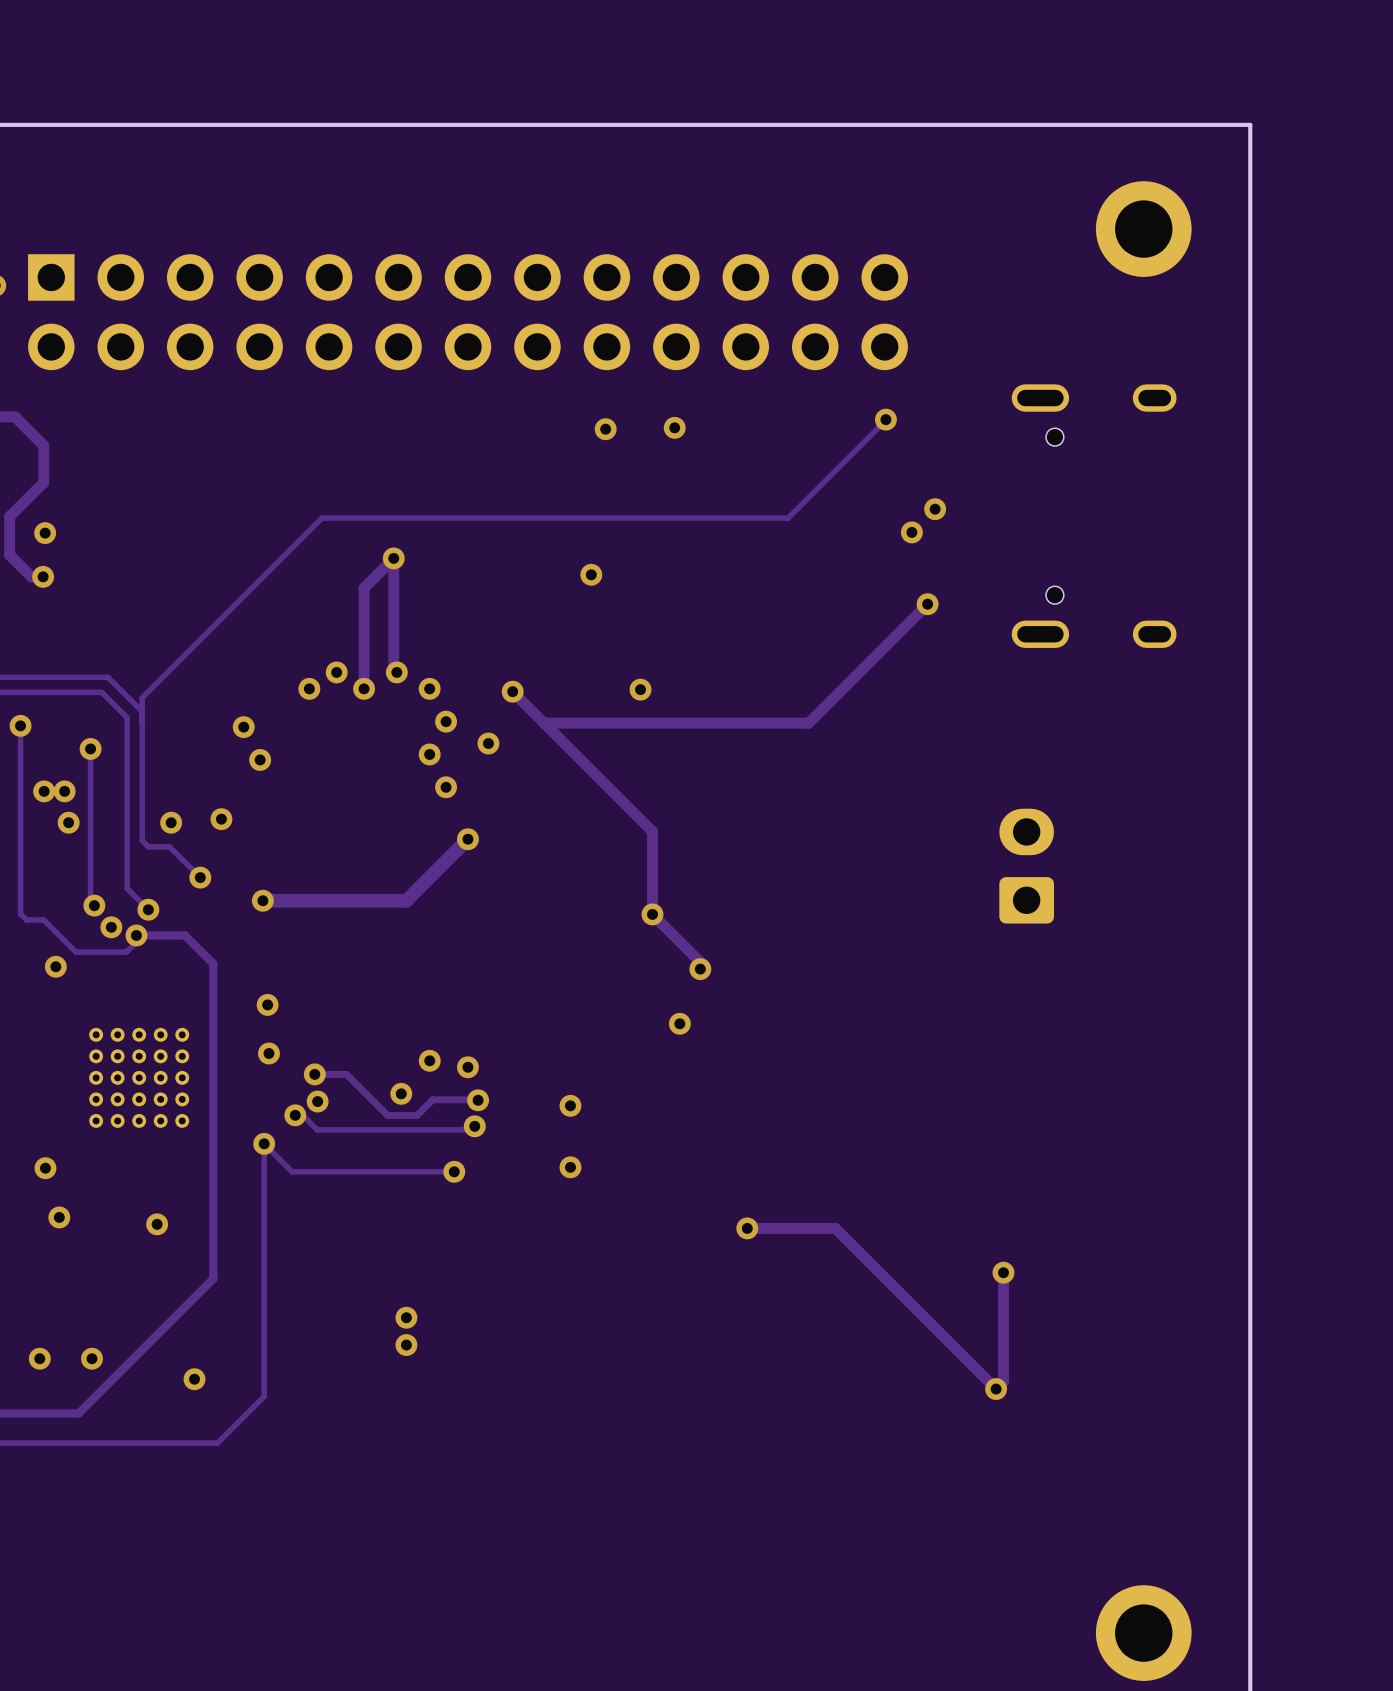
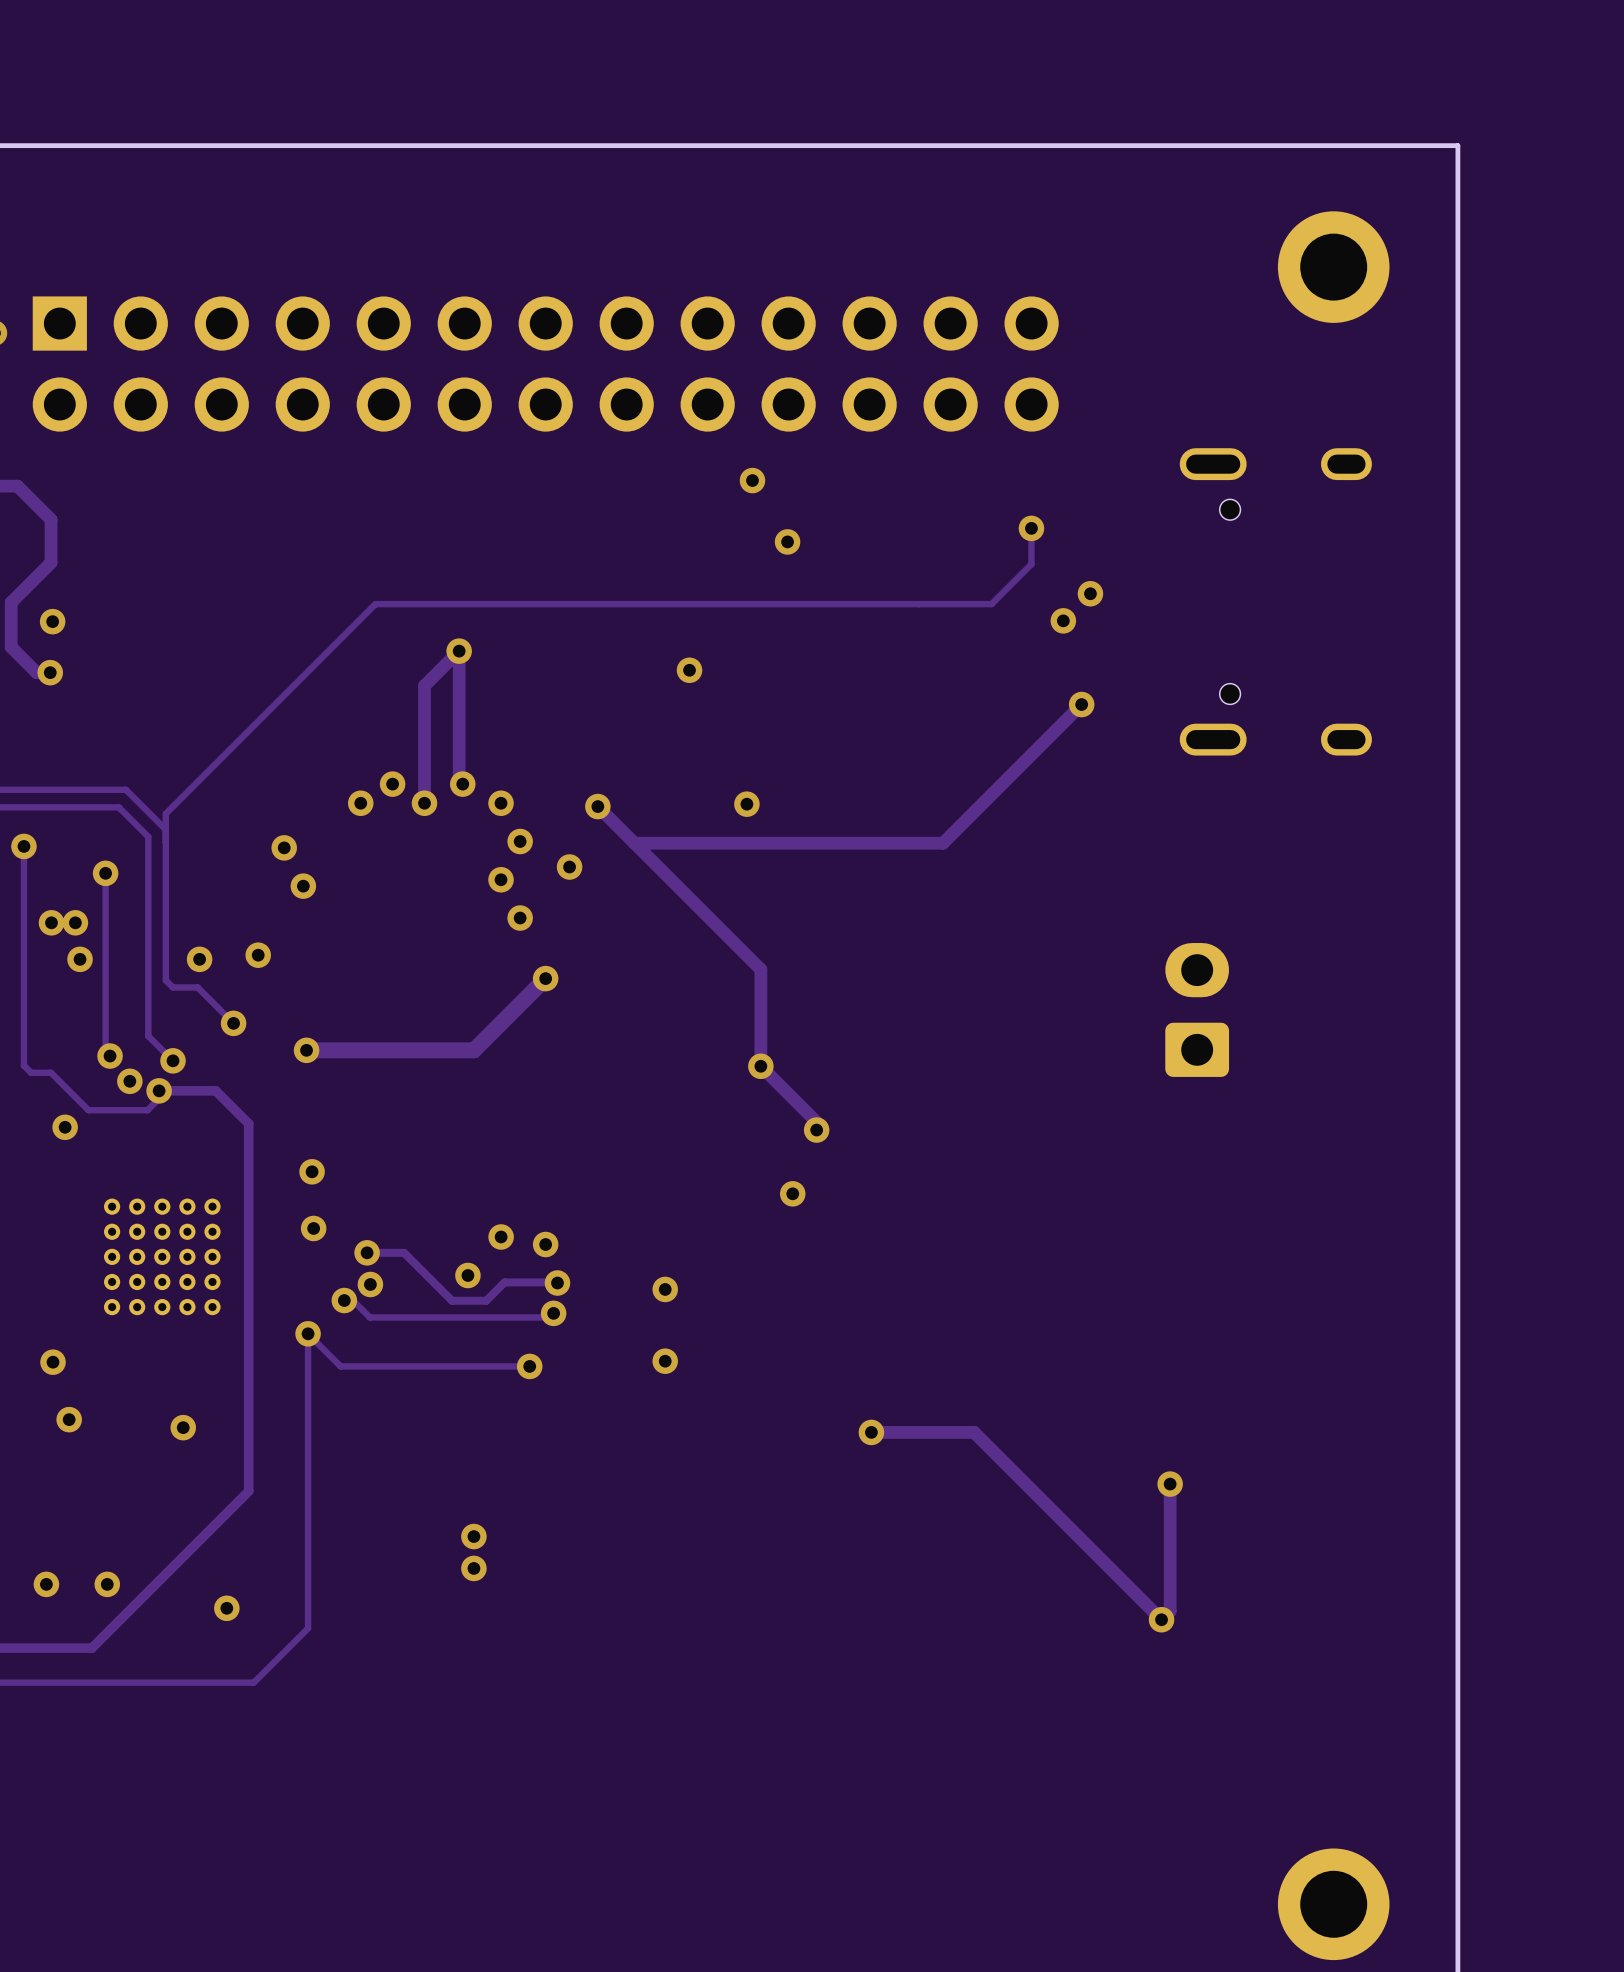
via: none -> (752, 480)
track: (885, 419) (788, 518) -> (1031, 528) (1031, 564) (991, 604) (919, 604)
via position: (885, 419) -> (1031, 528)
via: (674, 427) -> none
via: (605, 429) -> none
via: none -> (787, 541)

